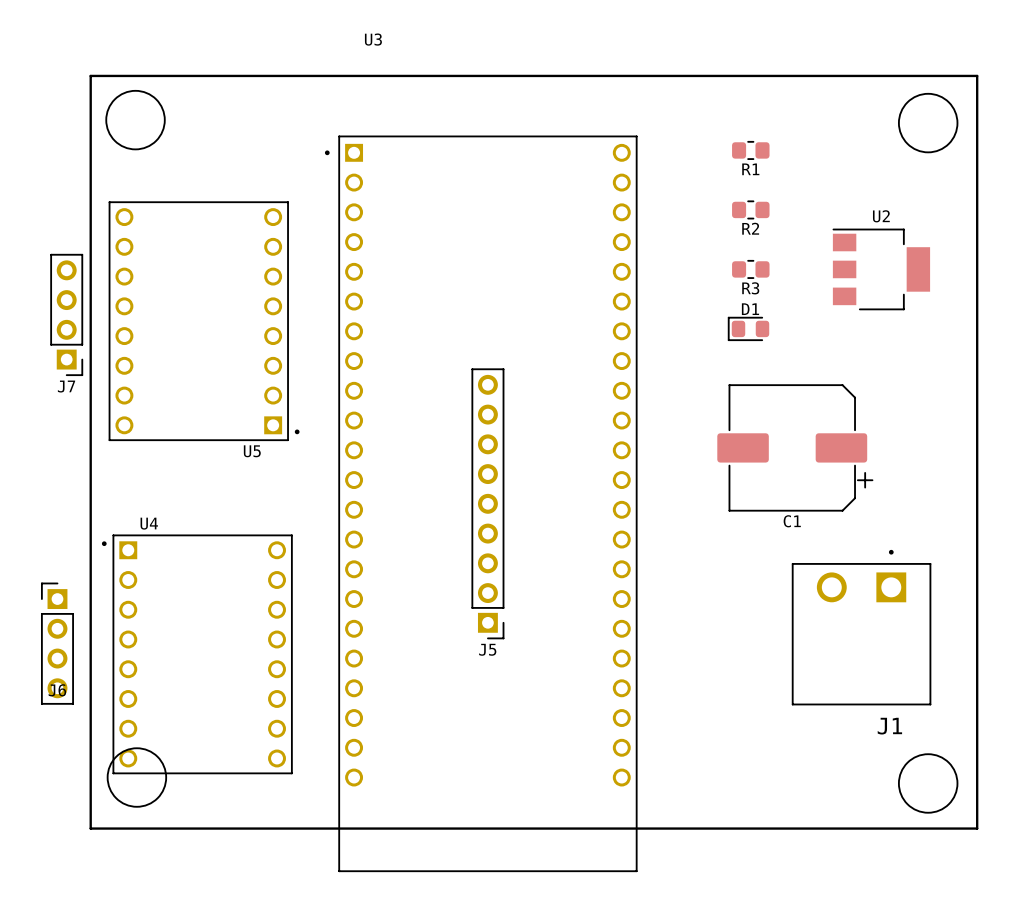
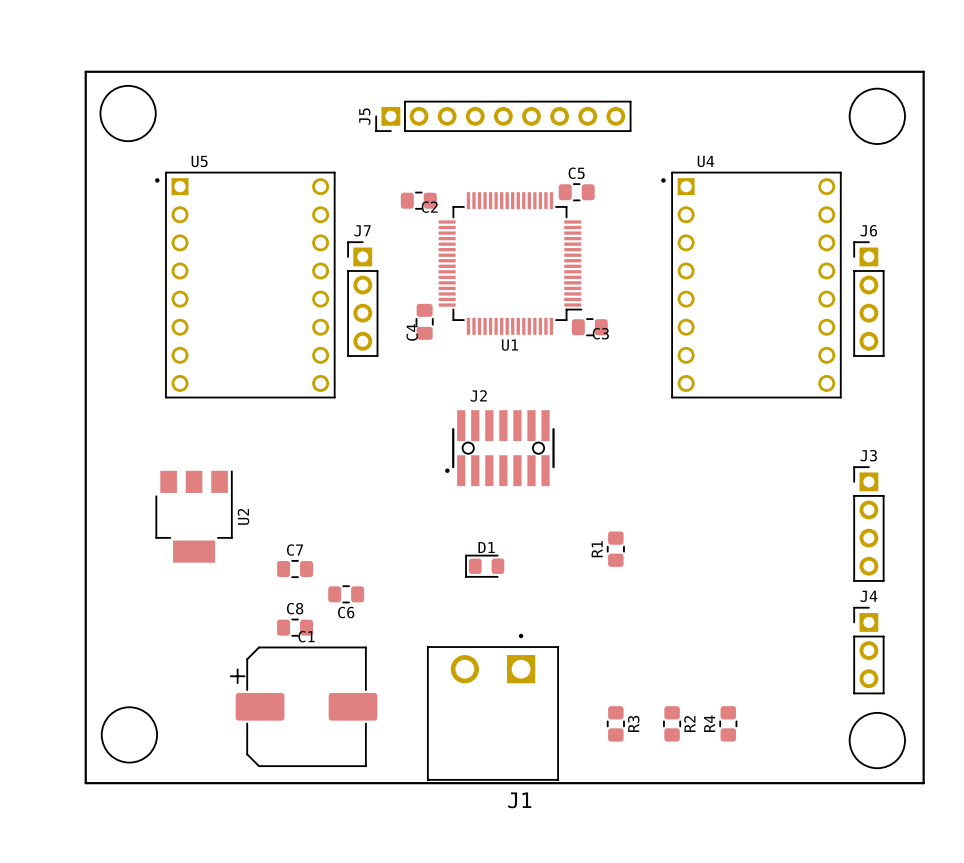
R1 rotation: 0° (750, 150) -> 90° clockwise (615, 549)
R1 position: (750, 150) -> (615, 549)
C5: none -> (576, 192)
R2 rotation: 0° (750, 209) -> 90° clockwise (672, 723)
R2 position: (750, 209) -> (672, 723)
C2: none -> (418, 200)
R2 name position: R2 (750, 228) -> R2 (689, 723)
R3 rotation: 0° (750, 269) -> 90° clockwise (615, 723)
R3 position: (750, 269) -> (615, 723)
U2 rotation: 0° (881, 269) -> 90° clockwise (194, 516)
U2 position: (881, 269) -> (194, 516)
U1: none -> (510, 263)
R3 name position: R3 (750, 288) -> R3 (633, 723)
J7 rotation: 0° (66, 314) -> 180° (362, 299)
J7 position: (66, 314) -> (362, 299)
U5 rotation: 0° (204, 321) -> 180° (245, 285)
D1 position: (748, 328) -> (484, 566)
C4: none -> (424, 321)
C3: none -> (589, 327)
C1 rotation: 0° (795, 447) -> 180° (303, 706)
C1 position: (795, 447) -> (303, 706)
J2: none -> (499, 448)
U3: (481, 503) -> none
J5 rotation: 0° (487, 503) -> 90° clockwise (503, 116)
J5 position: (487, 503) -> (503, 116)
J3: none -> (868, 524)
C7: none -> (295, 569)
J1 position: (861, 627) -> (492, 707)
C6: none -> (346, 594)
J6 position: (57, 643) -> (868, 299)
U4 position: (197, 654) -> (751, 285)
C8: none -> (295, 627)
J4: none -> (868, 650)
J6 name position: J6 (57, 690) -> J6 (868, 230)
R4: none -> (728, 723)

